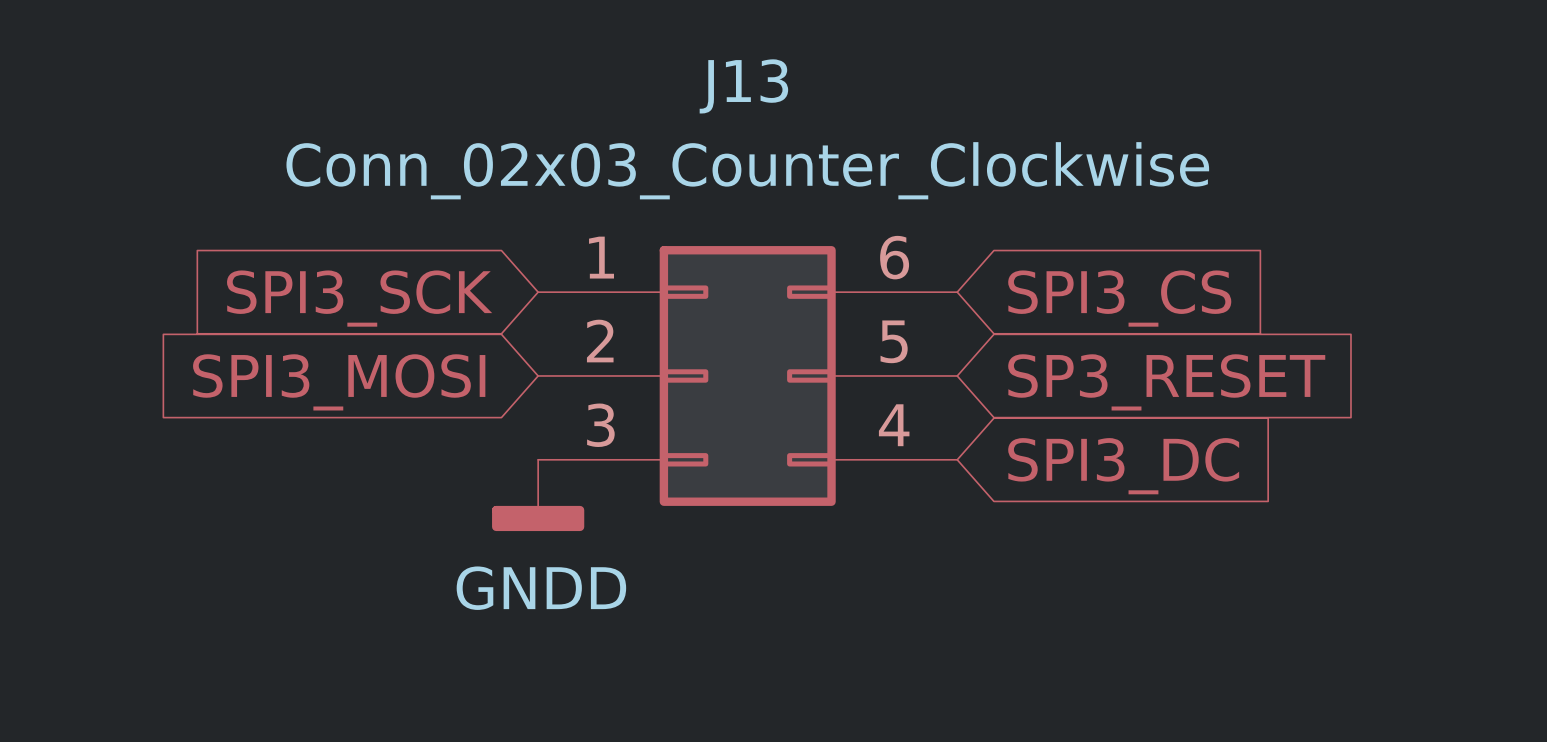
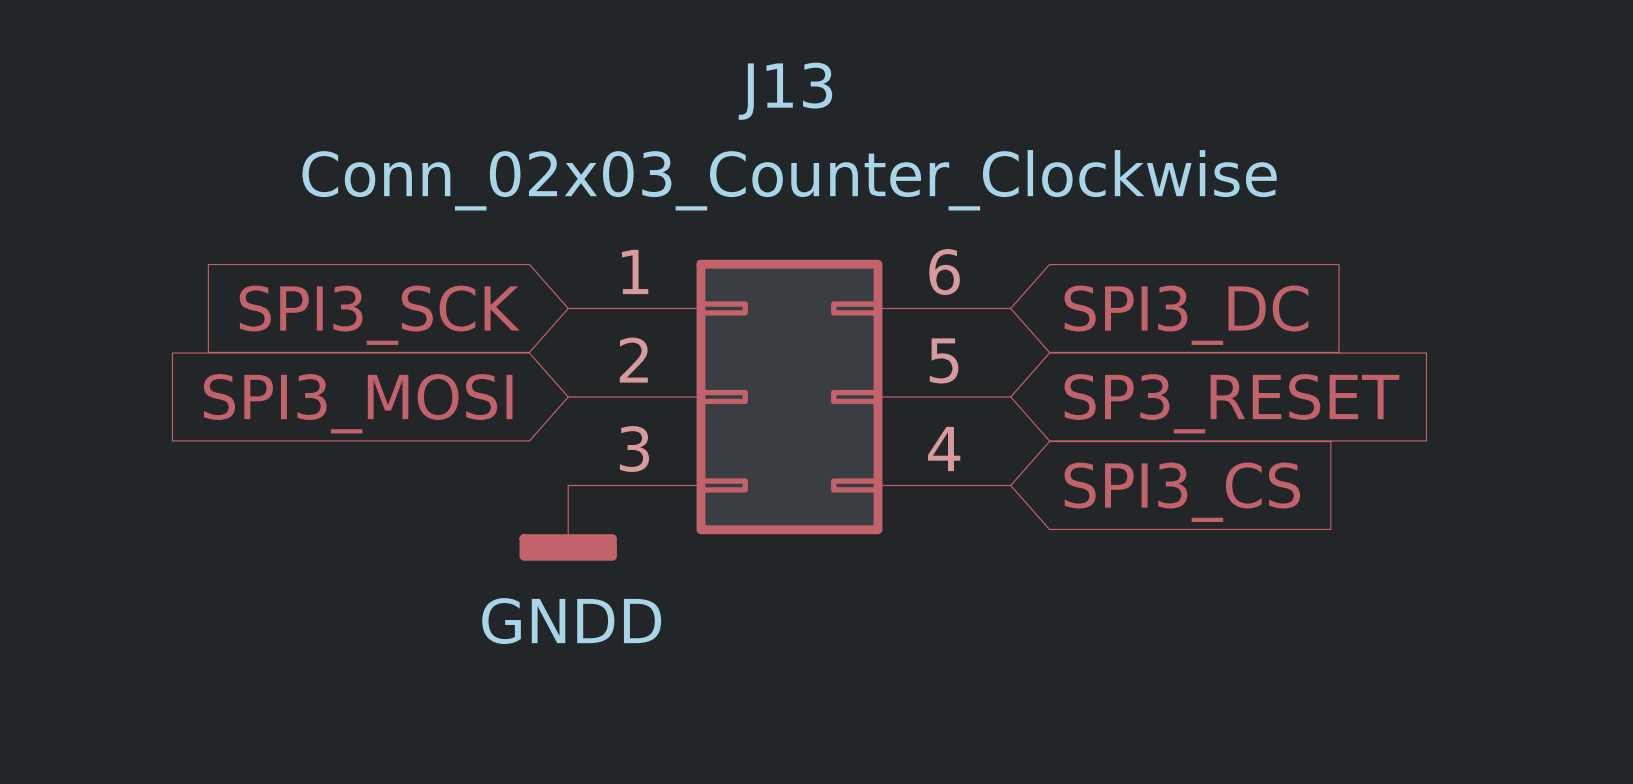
global label: SPI3_CS (1119, 298) -> SPI3_DC (1186, 315)
global label: SPI3_DC (1123, 466) -> SPI3_CS (1182, 492)

